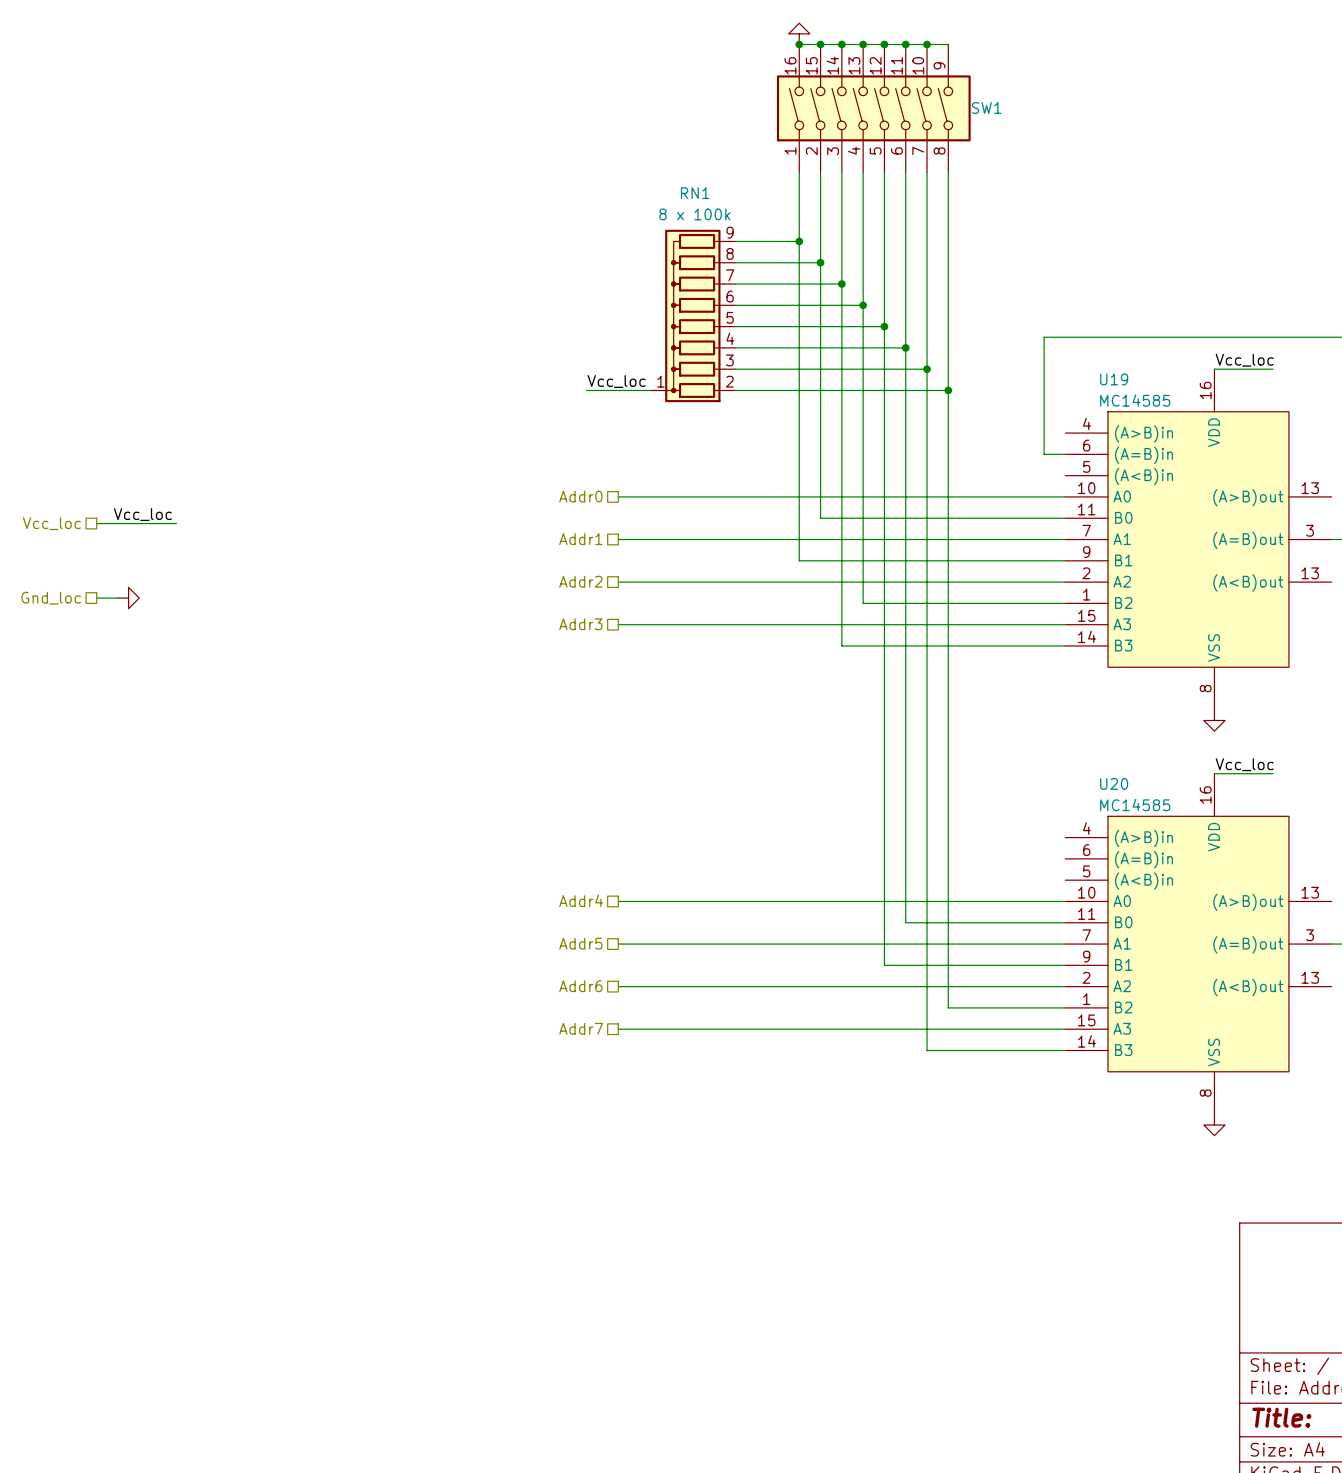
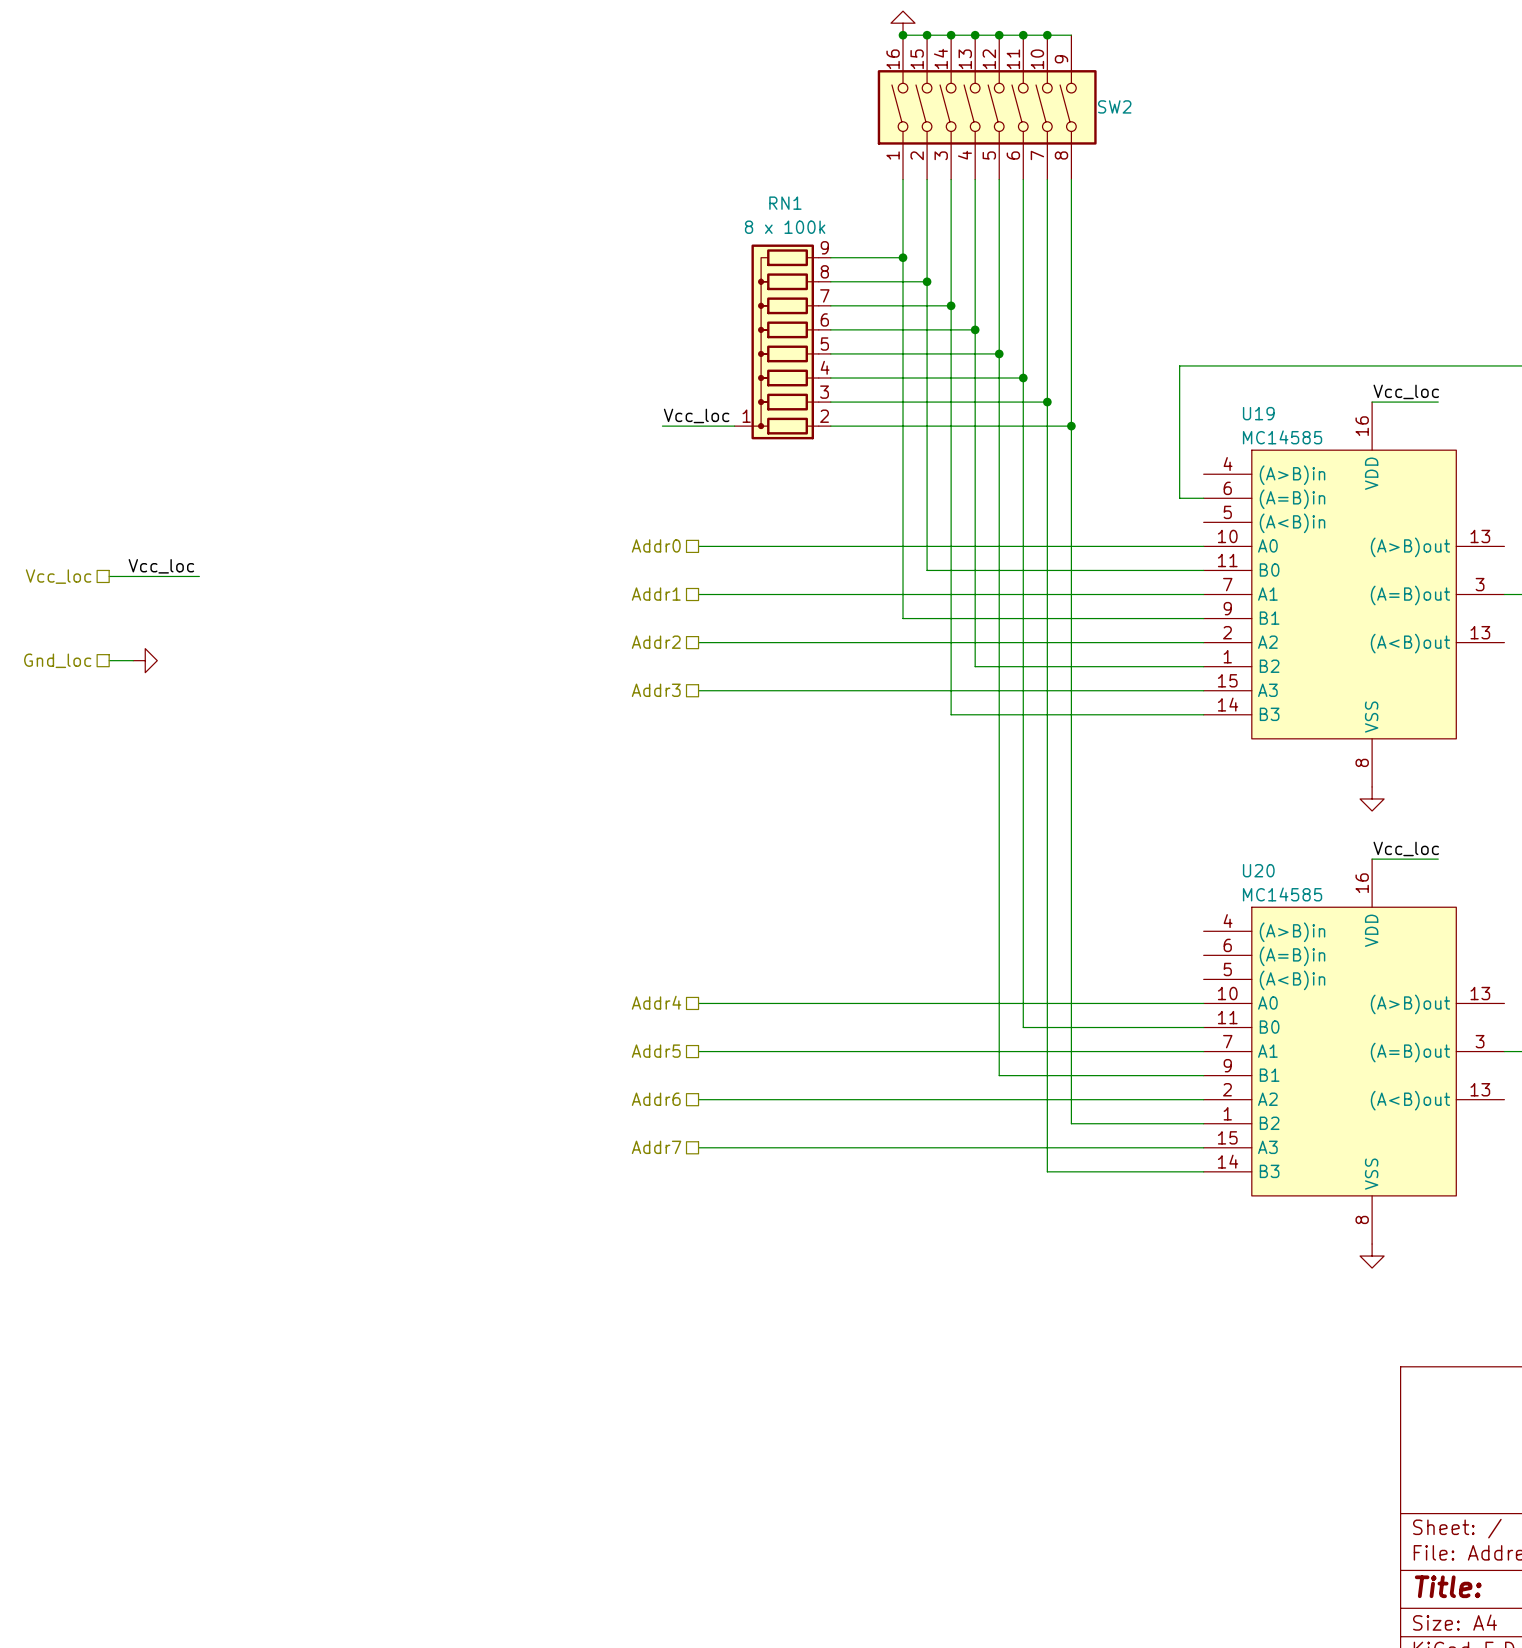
SW1 name: SW1 (986, 107) -> SW2 (1114, 106)

